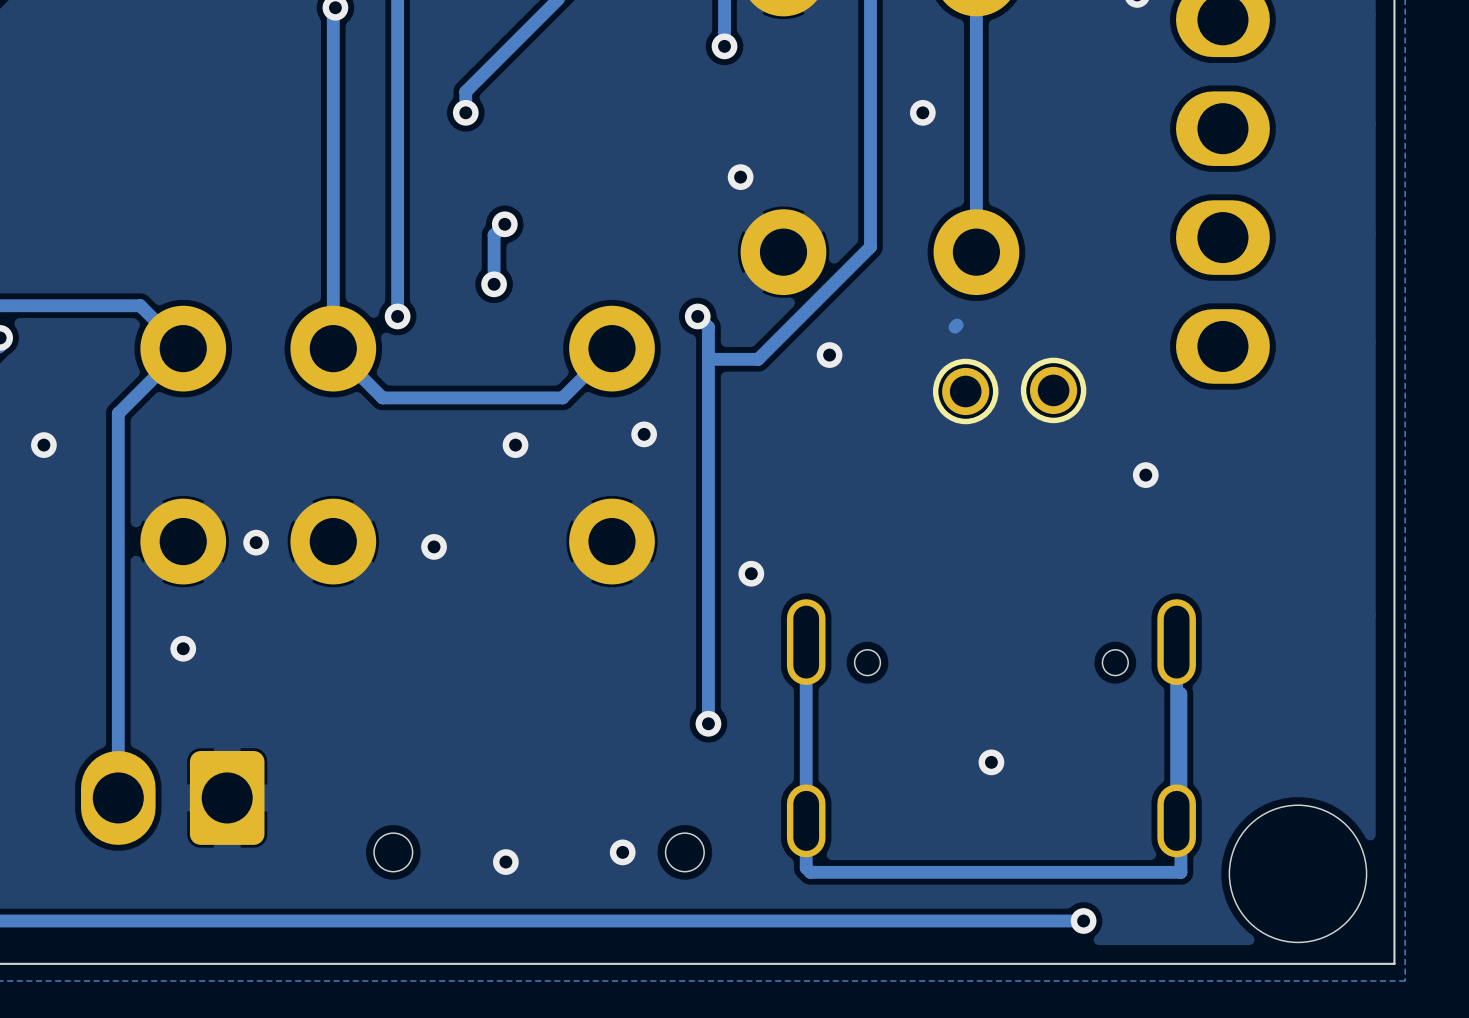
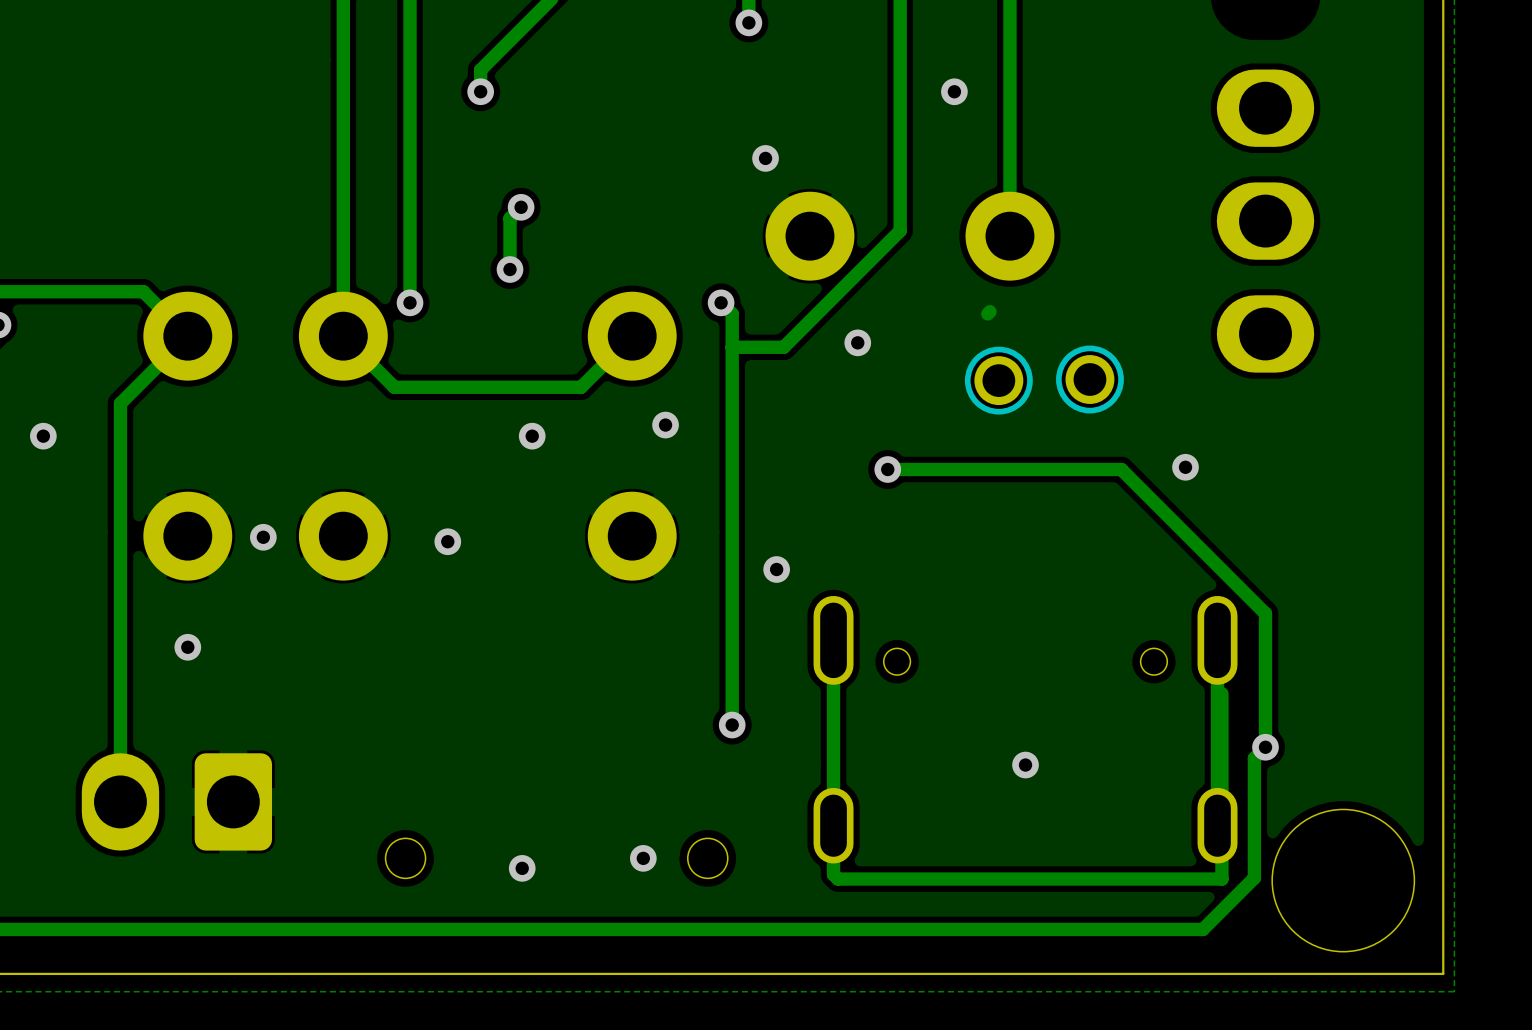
track: none -> (887, 469) (1121, 469) (1265, 613) (1265, 747) (1254, 758) (1254, 878) (1202, 929) (1121, 929)
via: none -> (887, 469)
via position: (1083, 920) -> (1265, 747)

